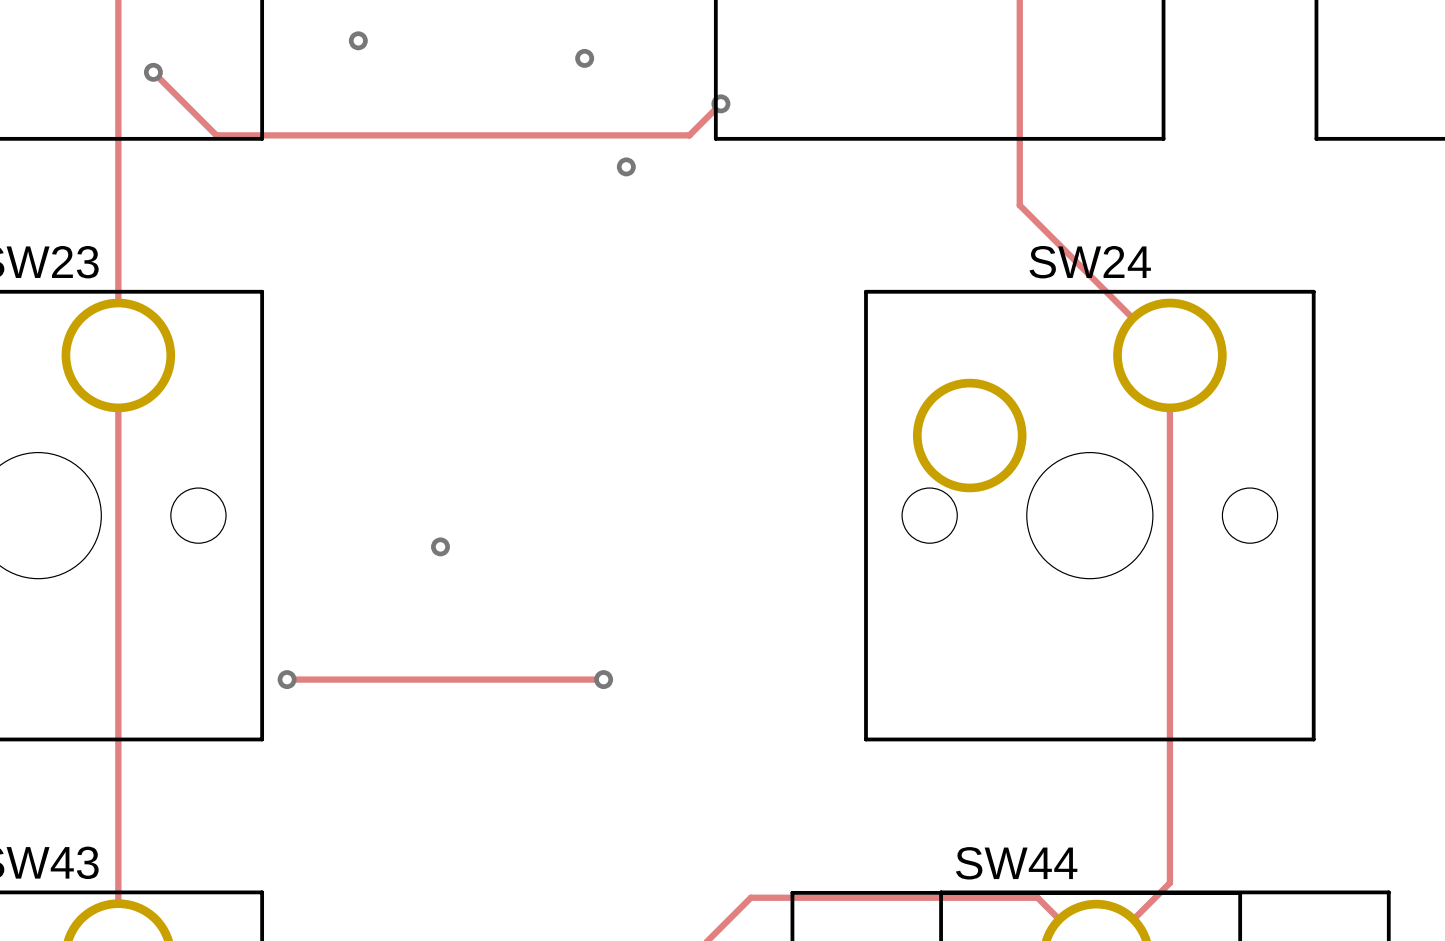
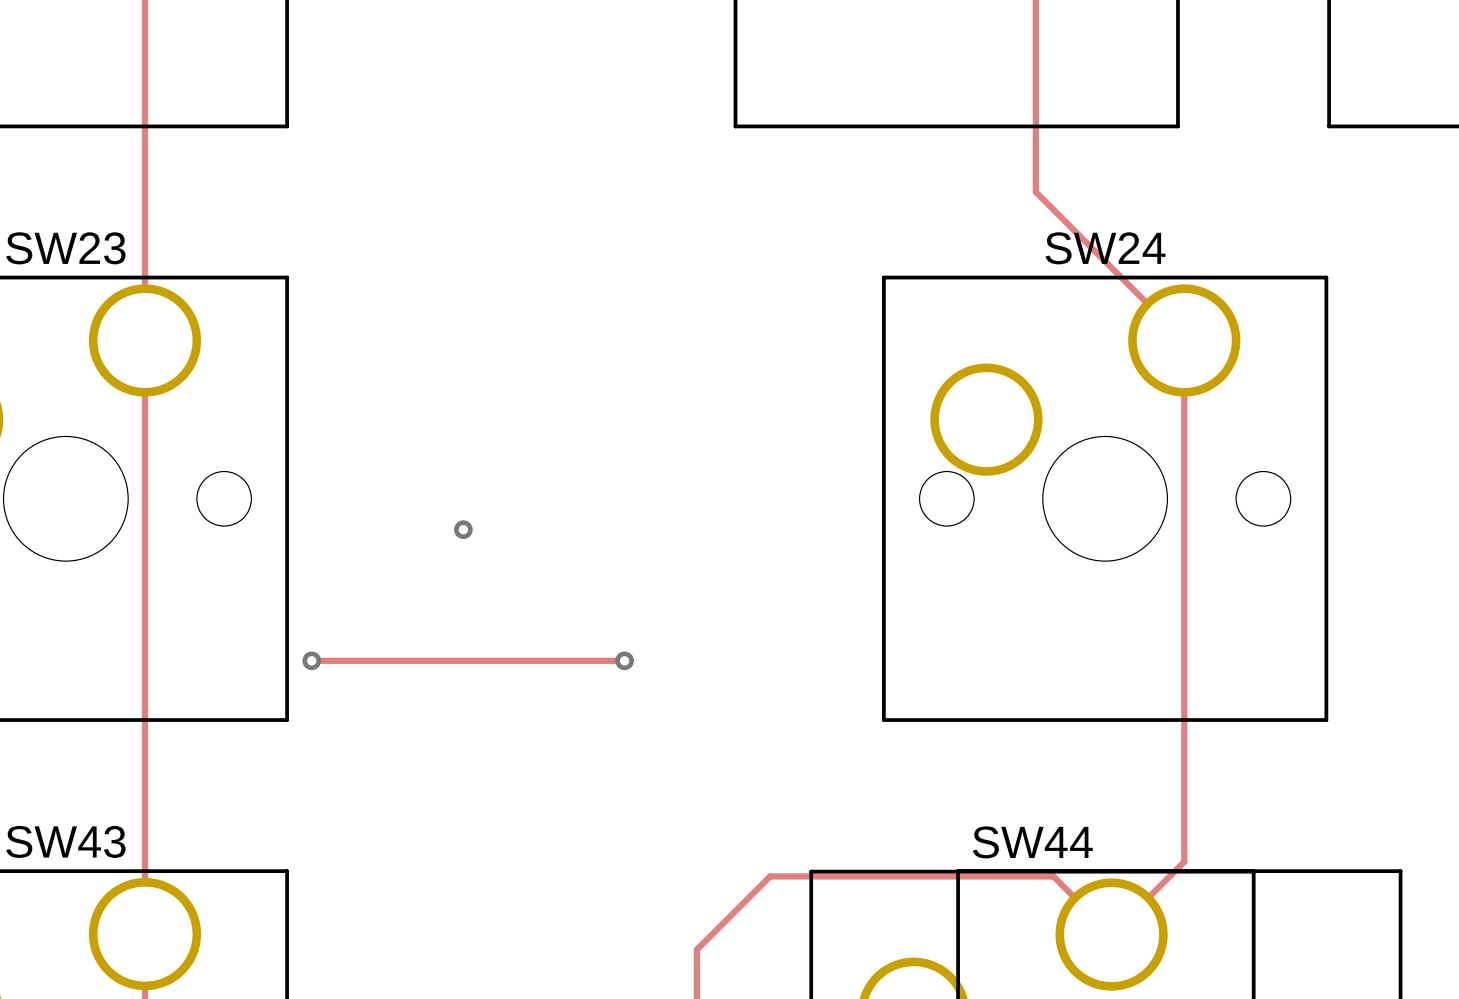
via: (358, 40) -> none
via: (584, 58) -> none
track: (153, 72) (216, 135) (689, 135) (720, 103) -> none
via: (153, 72) -> none
via: (720, 103) -> none
via: (626, 166) -> none

